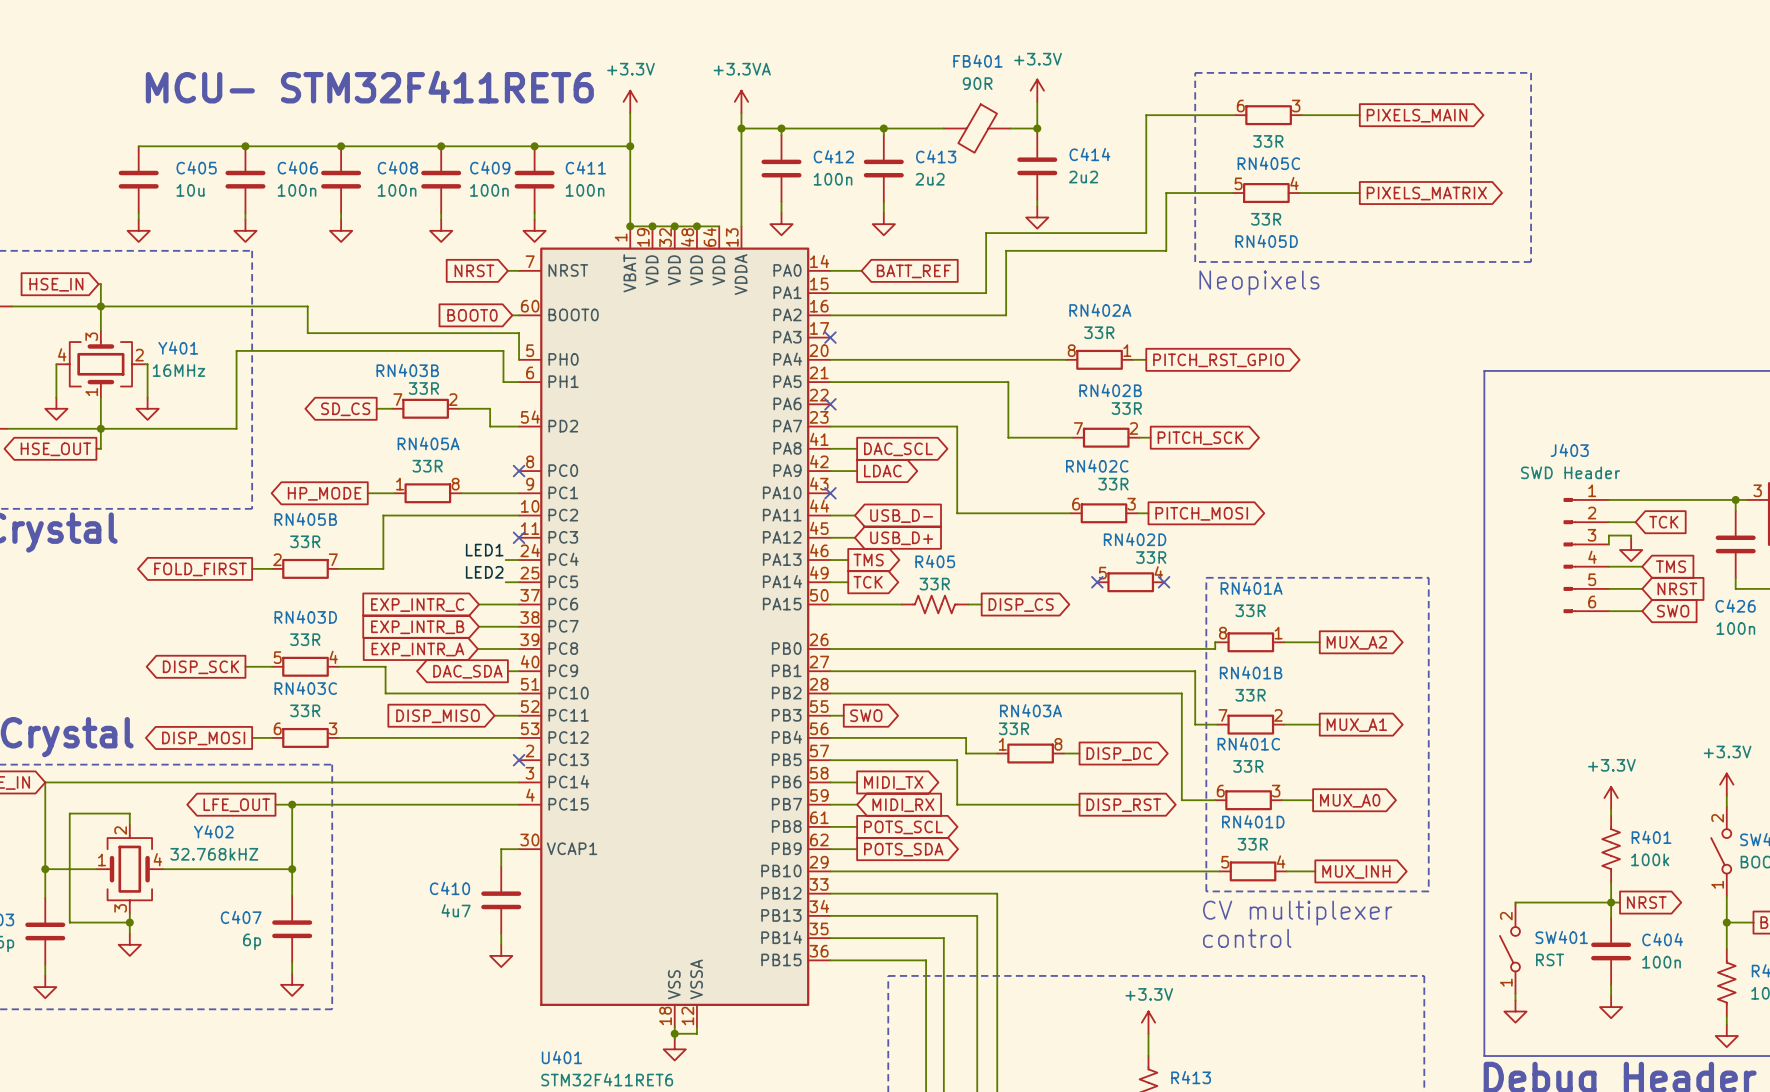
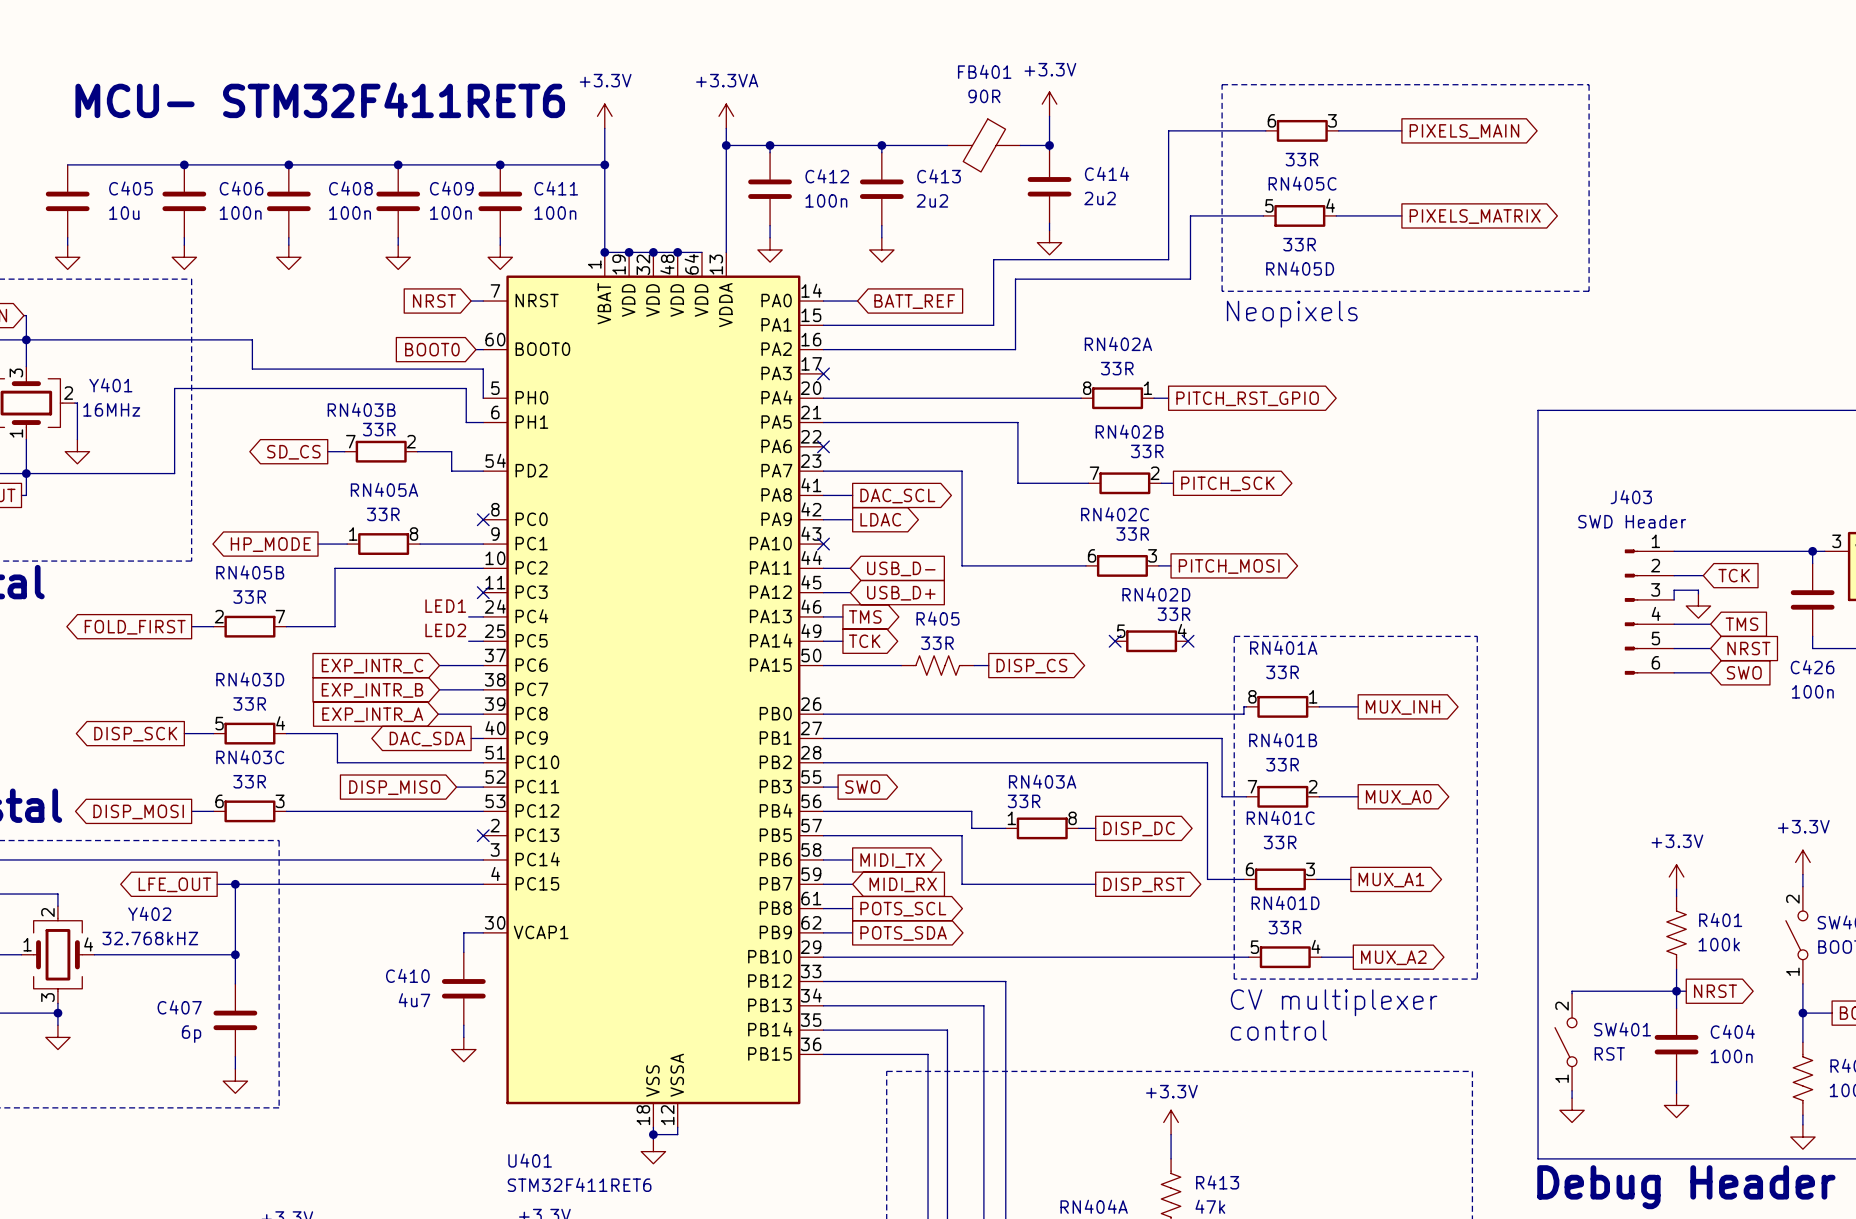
global label: MUX_A2 (1356, 642) -> MUX_INH (1403, 707)
global label: MUX_A1 (1356, 725) -> MUX_A0 (1398, 797)
global label: MUX_A0 (1350, 800) -> MUX_A1 (1391, 880)
global label: MUX_INH (1356, 871) -> MUX_A2 (1393, 957)

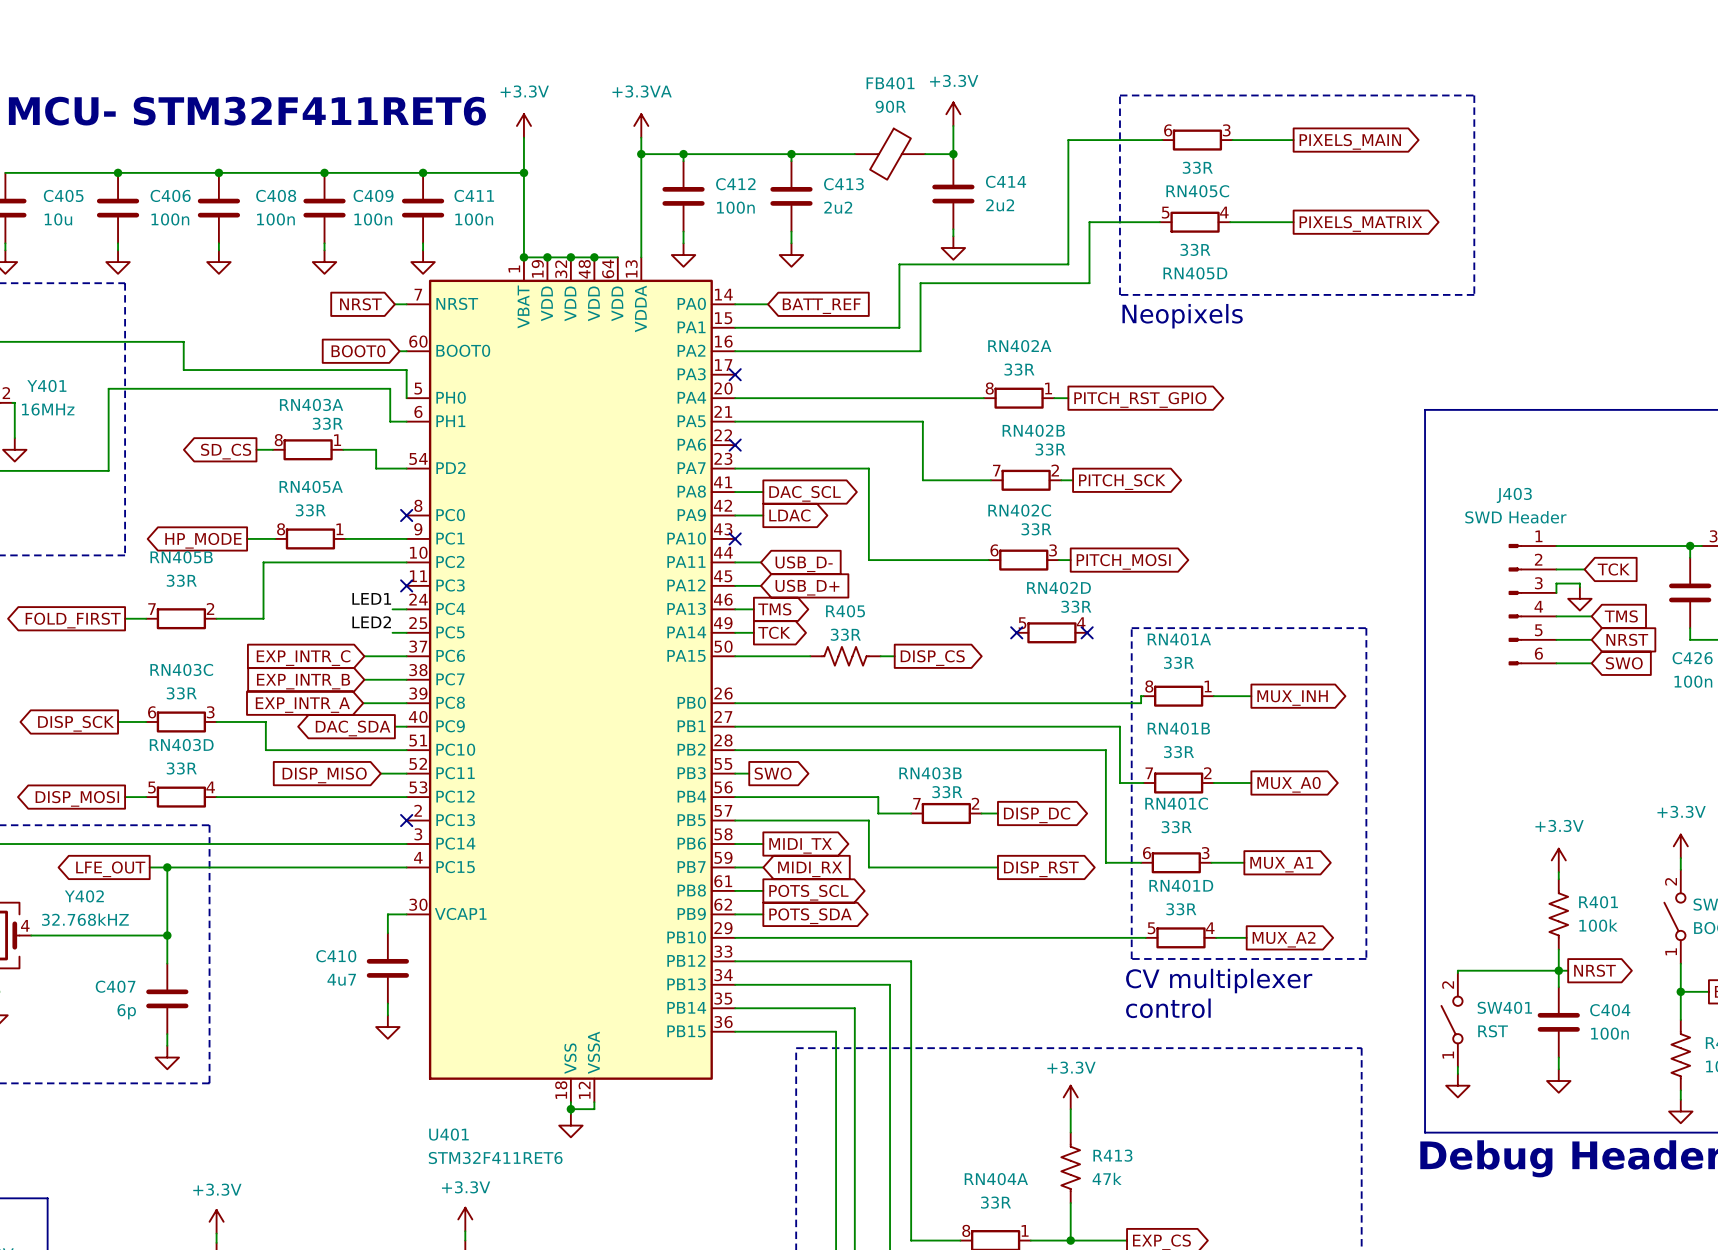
RN403B position: (381, 451) -> (946, 813)
RN405A rotation: 0° (383, 544) -> 180° (310, 538)
RN405B rotation: 0° (249, 626) -> 180° (181, 618)
RN403D position: (249, 733) -> (181, 797)
RN403A value position: 33R (1024, 801) -> 33R (327, 423)
RN403C position: (249, 811) -> (181, 721)
RN403A rotation: 0° (1042, 828) -> 180° (308, 449)
RN403A position: (1042, 828) -> (308, 449)

